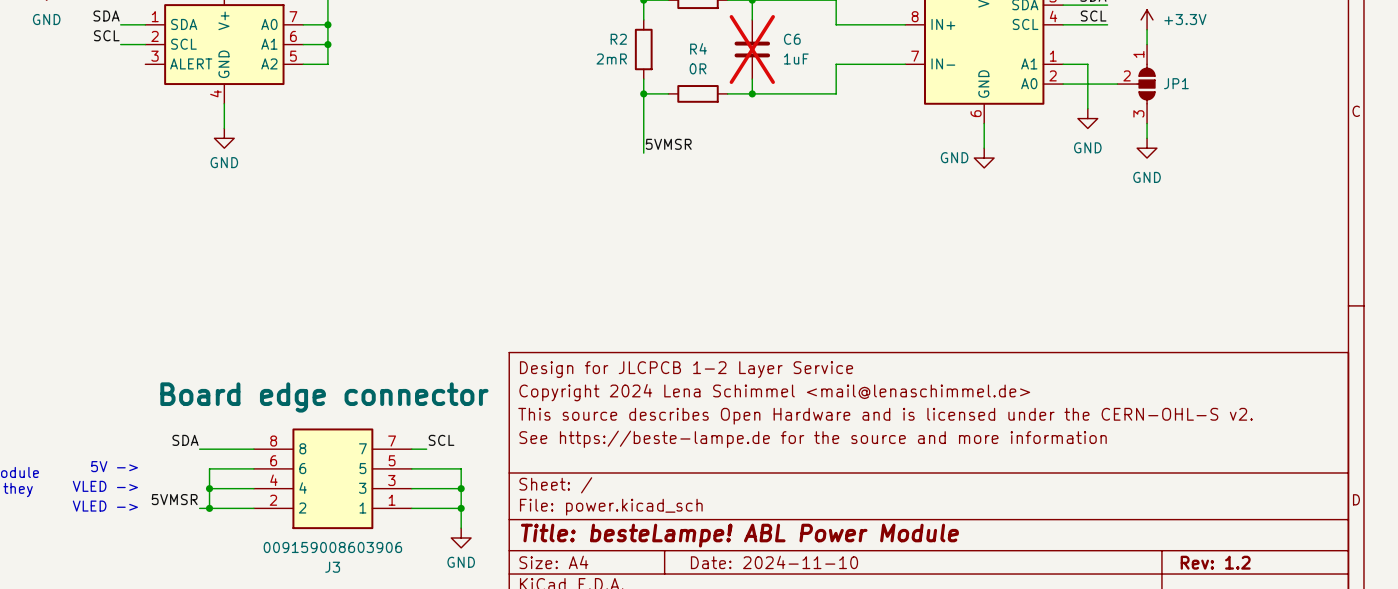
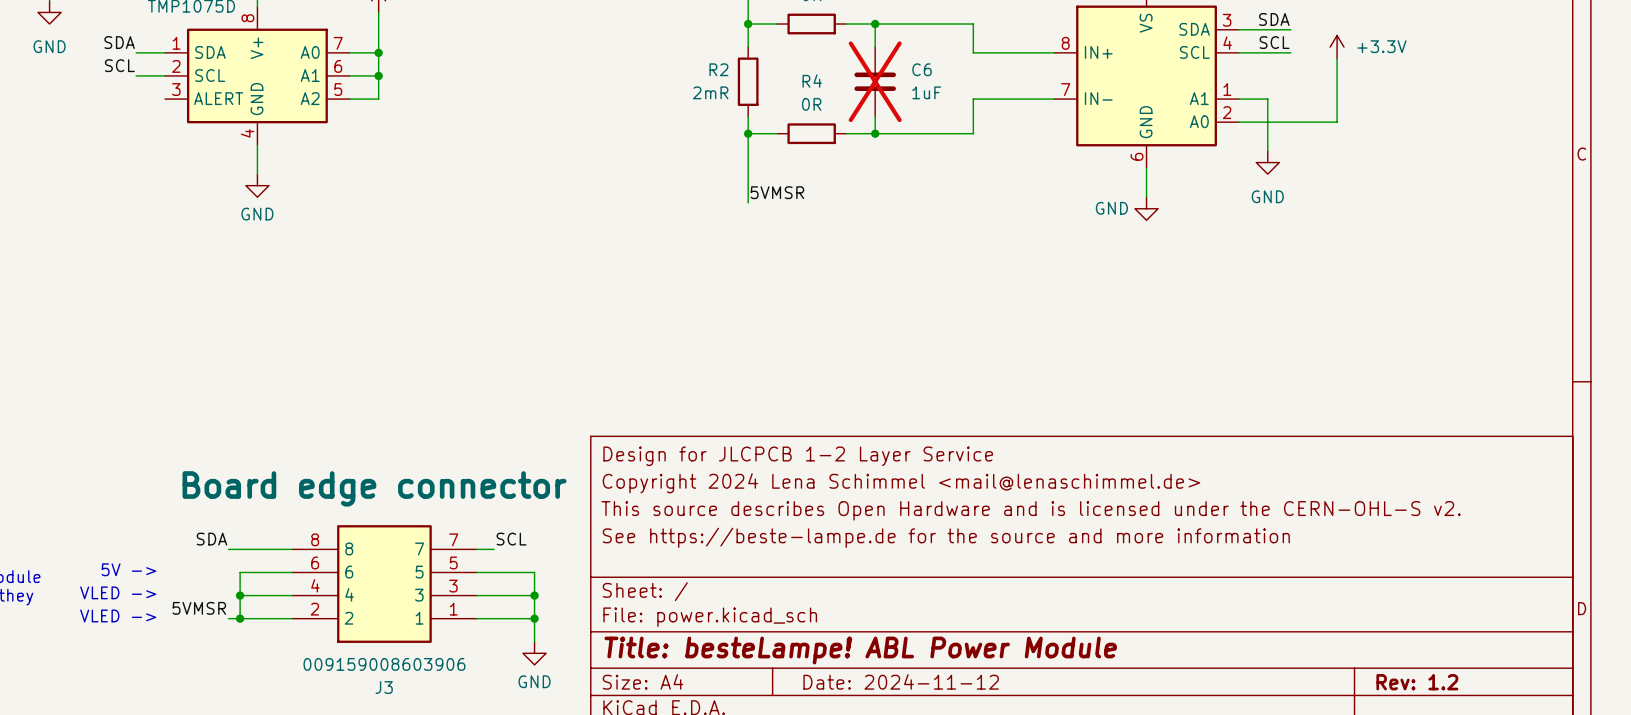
JP1: (1136, 84) -> none
wire: (1147, 123) (1147, 138) -> none
power symbol: GND (1147, 148) -> none
title block: Date: 2024-11-10 (774, 562) -> Date: 2024-11-12 (901, 681)

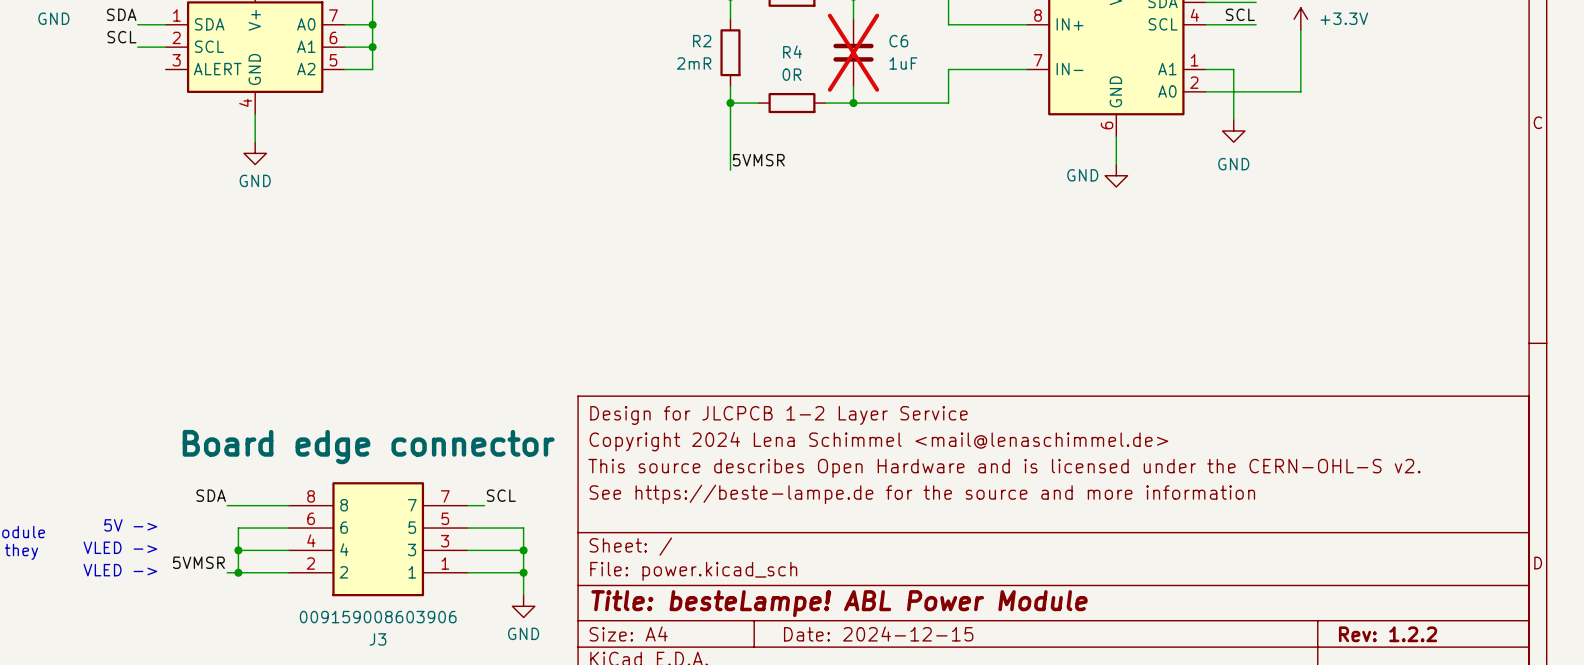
title block: Date: 2024-11-12 (901, 681) -> Date: 2024-12-15 (878, 633)
title block: Rev: 1.2 (1417, 682) -> Rev: 1.2.2 (1388, 634)

